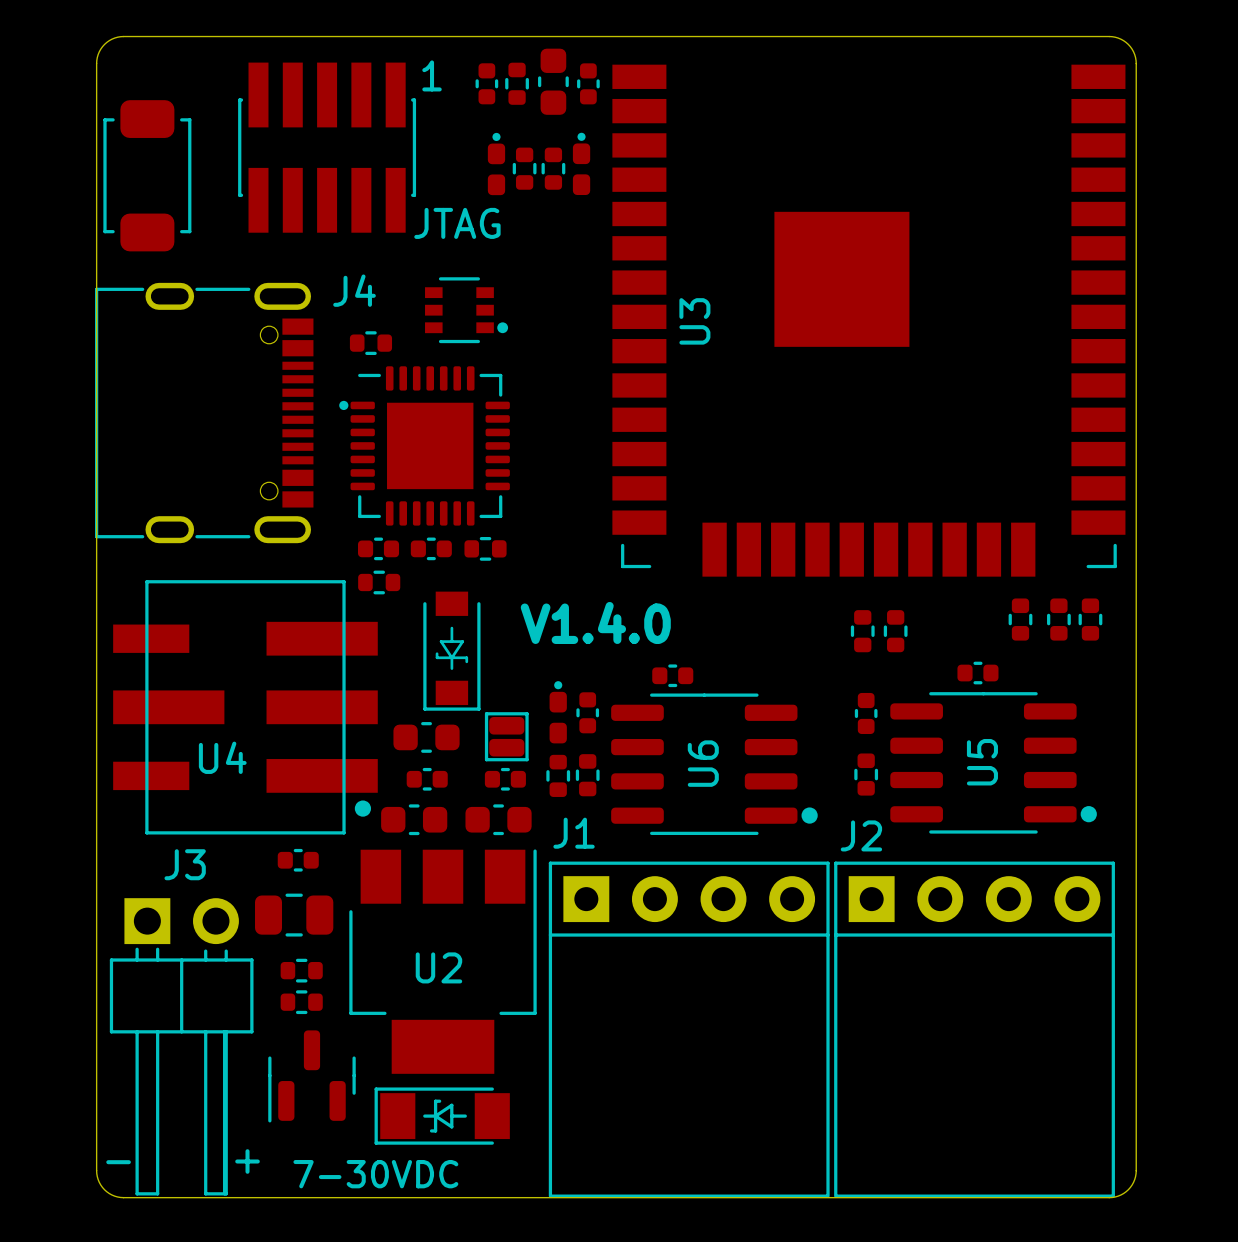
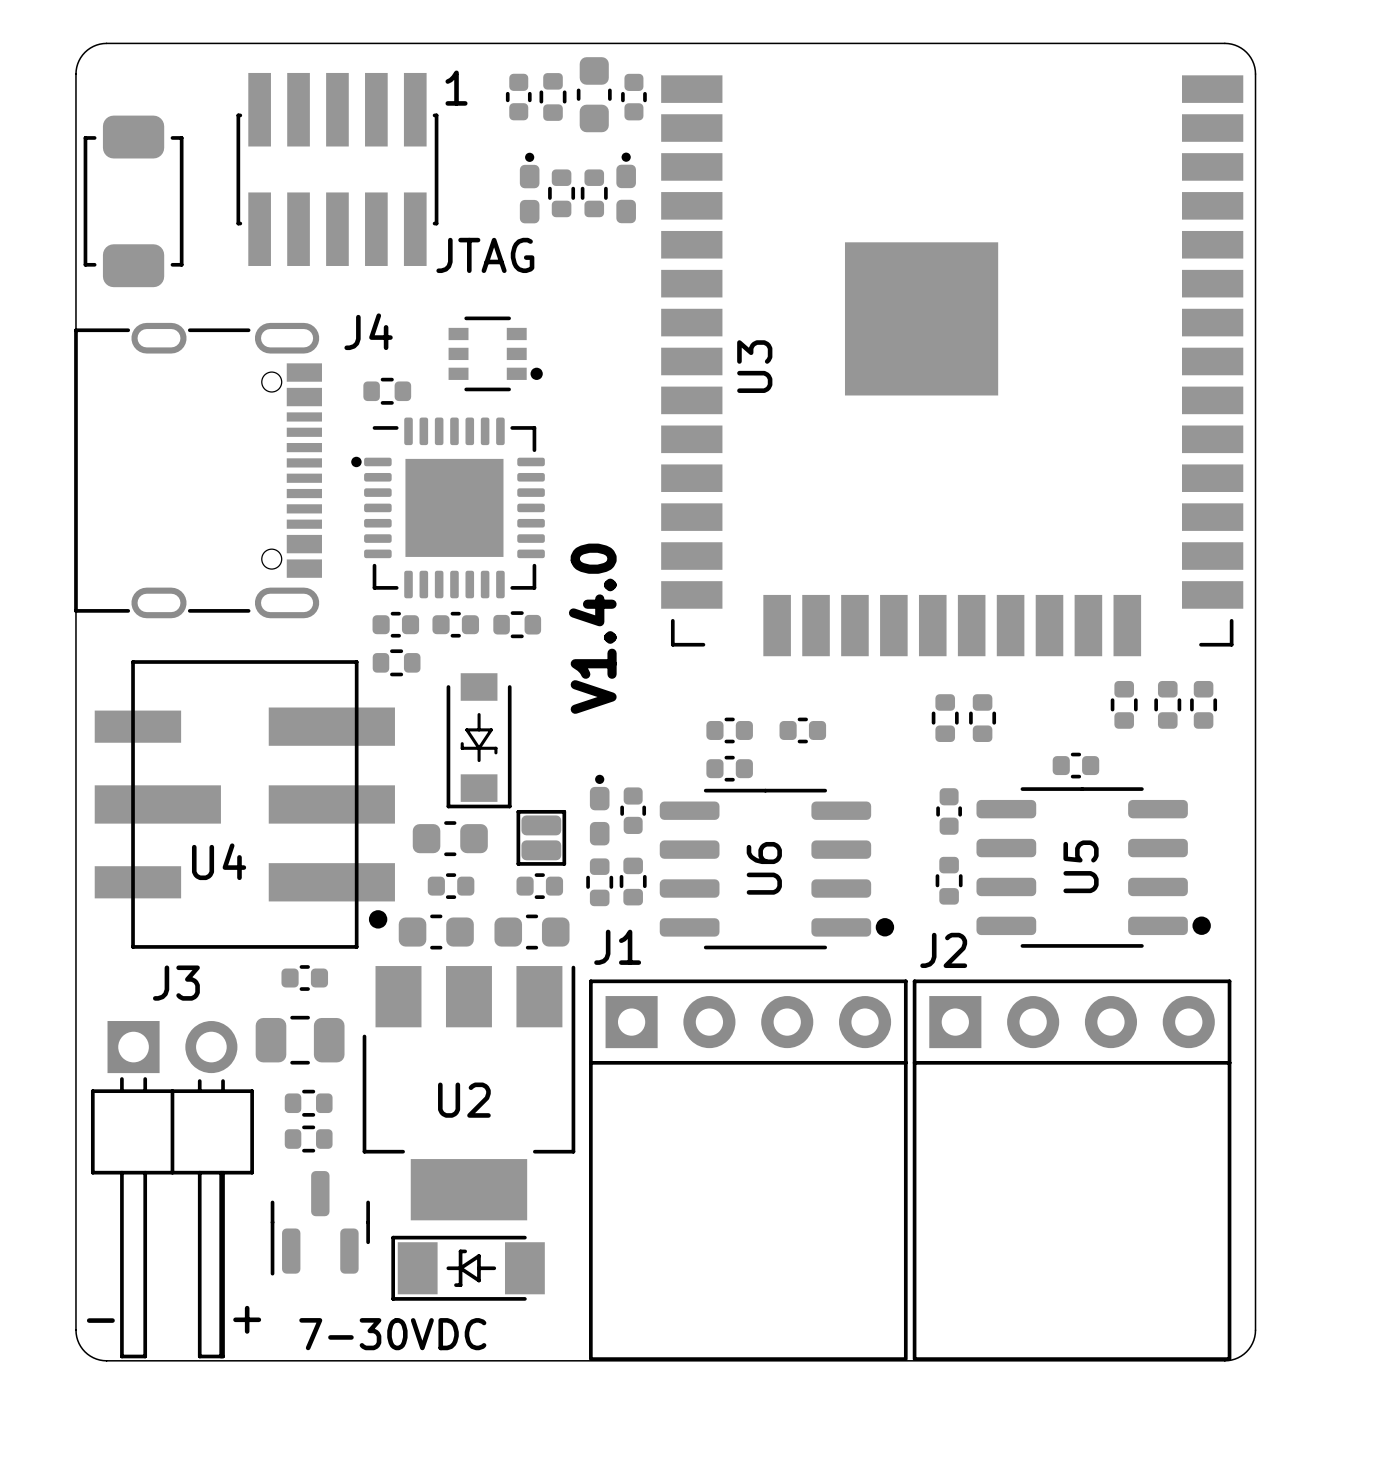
text rotation: 0° (595, 622) -> 90° counterclockwise (592, 628)
part: none -> (729, 730)
part: none -> (802, 730)

